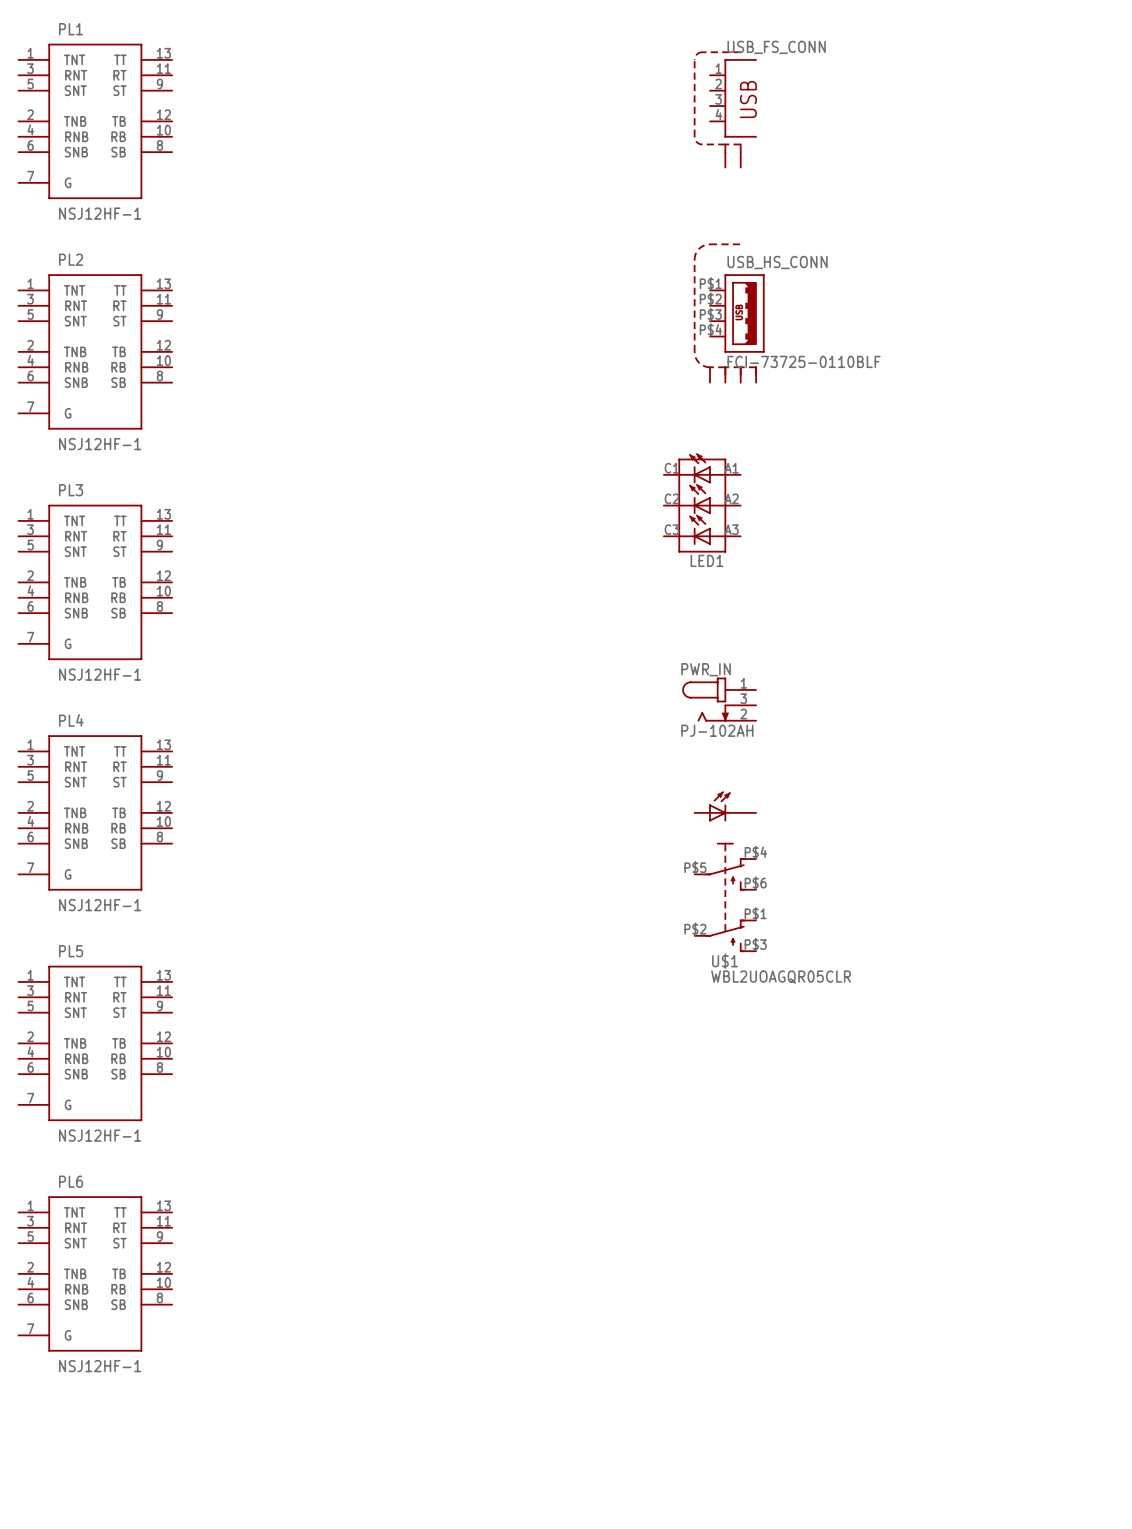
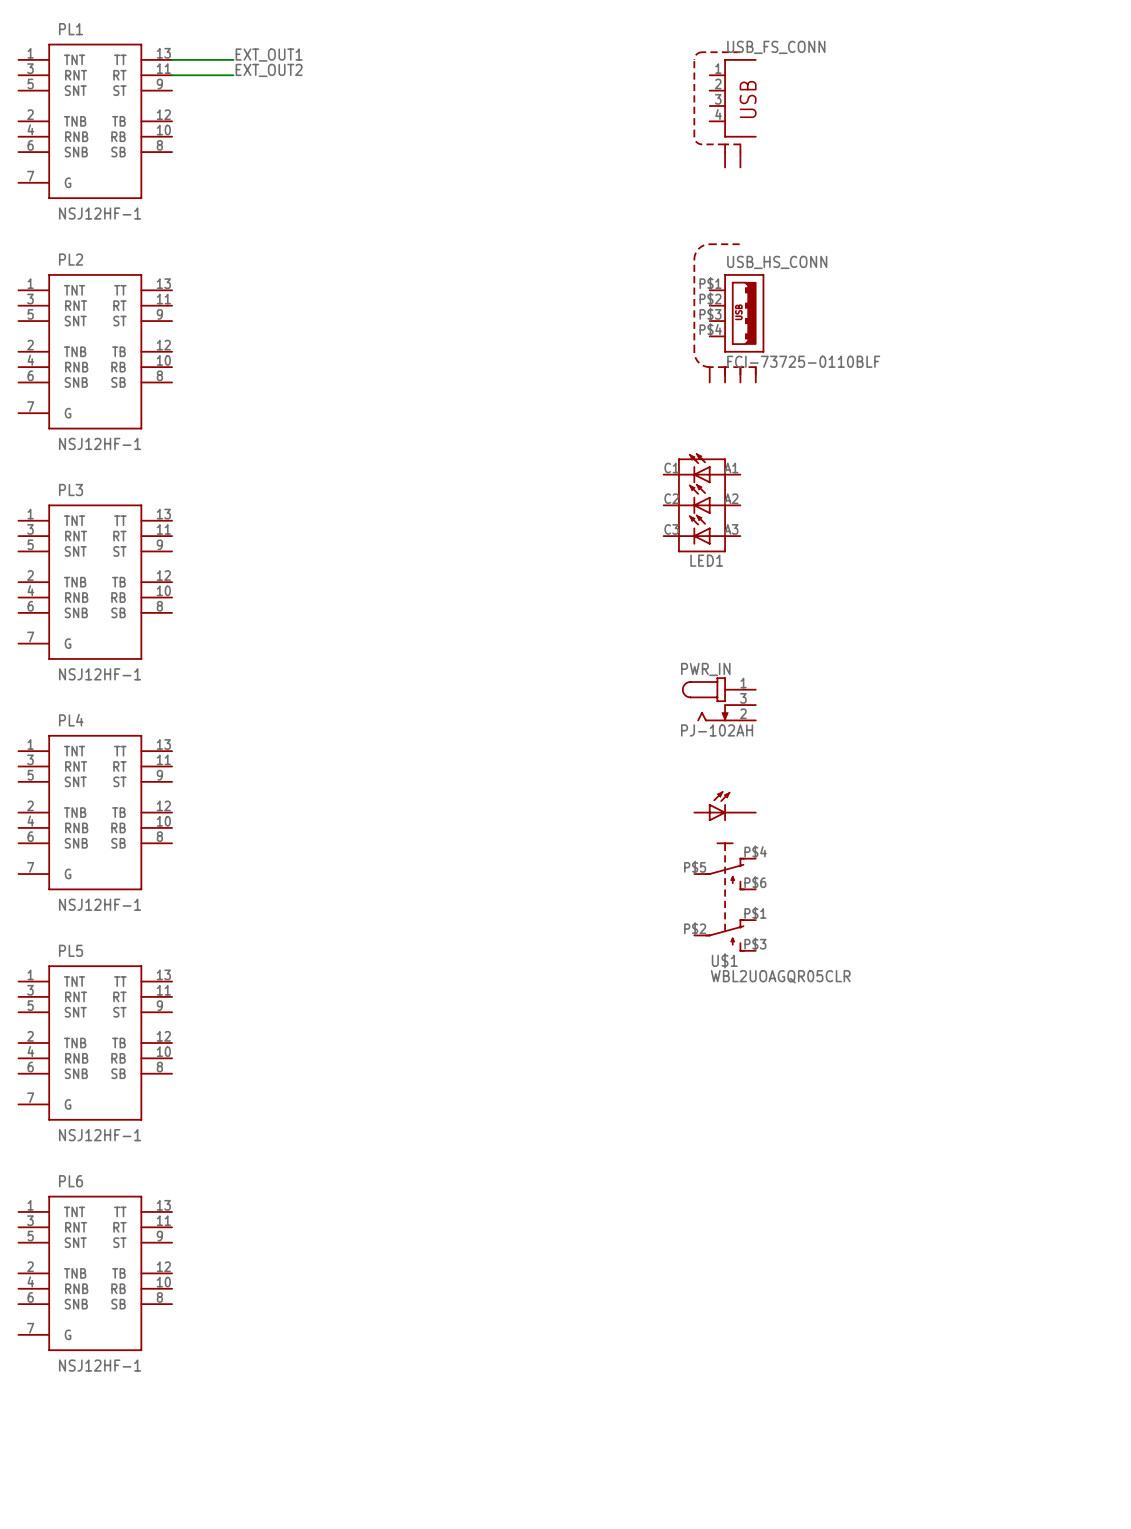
label: none -> EXT_OUT1 (269, 55)
wire: none -> (172, 59) (233, 59)
label: none -> EXT_OUT2 (269, 70)
wire: none -> (172, 75) (233, 75)

